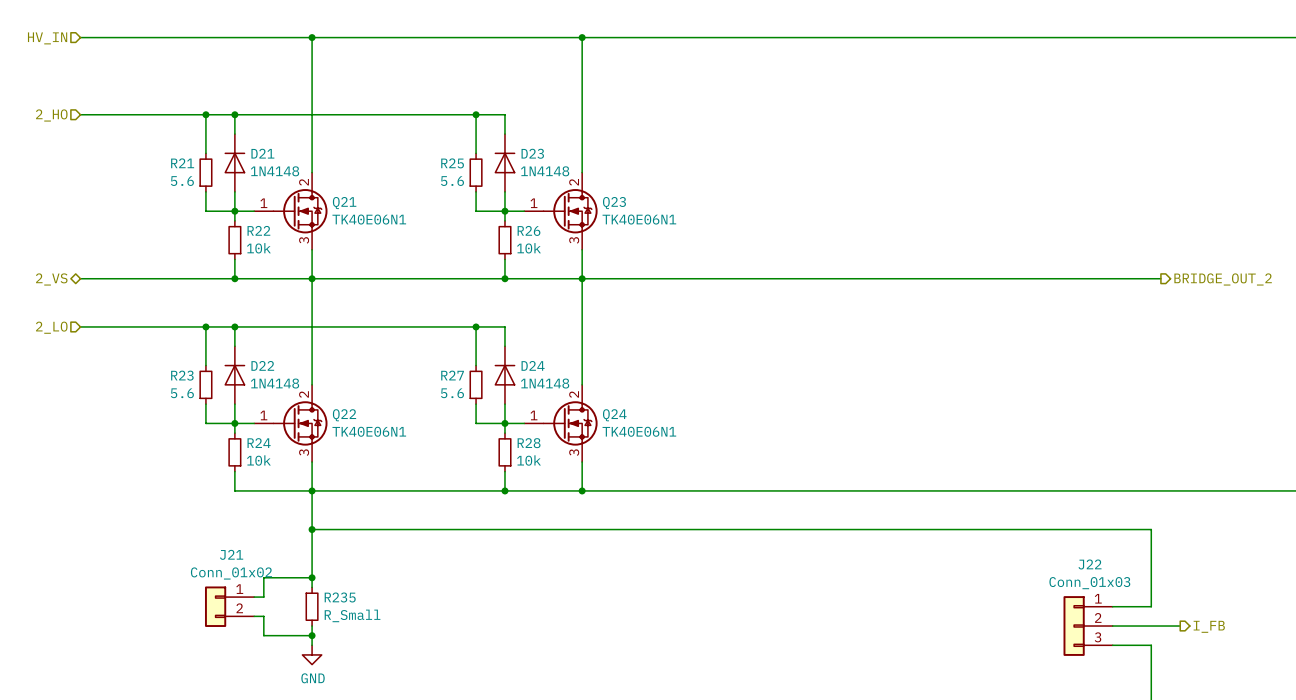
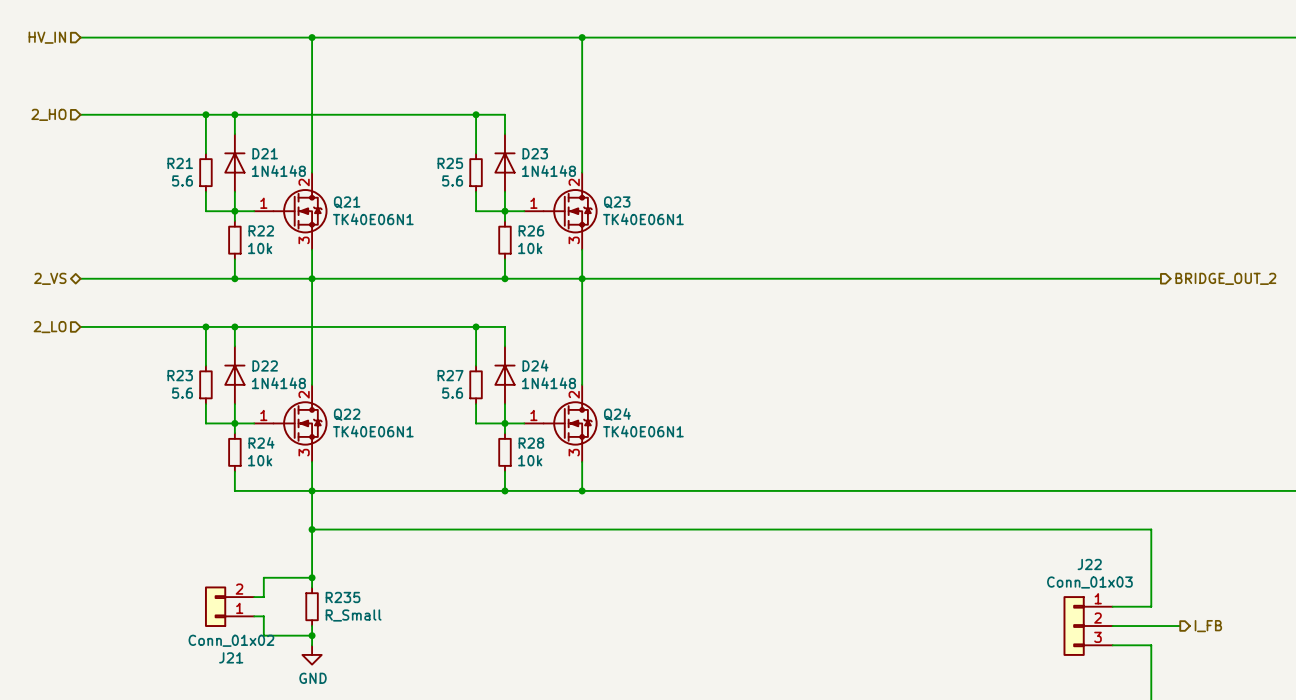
J21 flip: as is (215, 606) -> up-down (215, 606)

